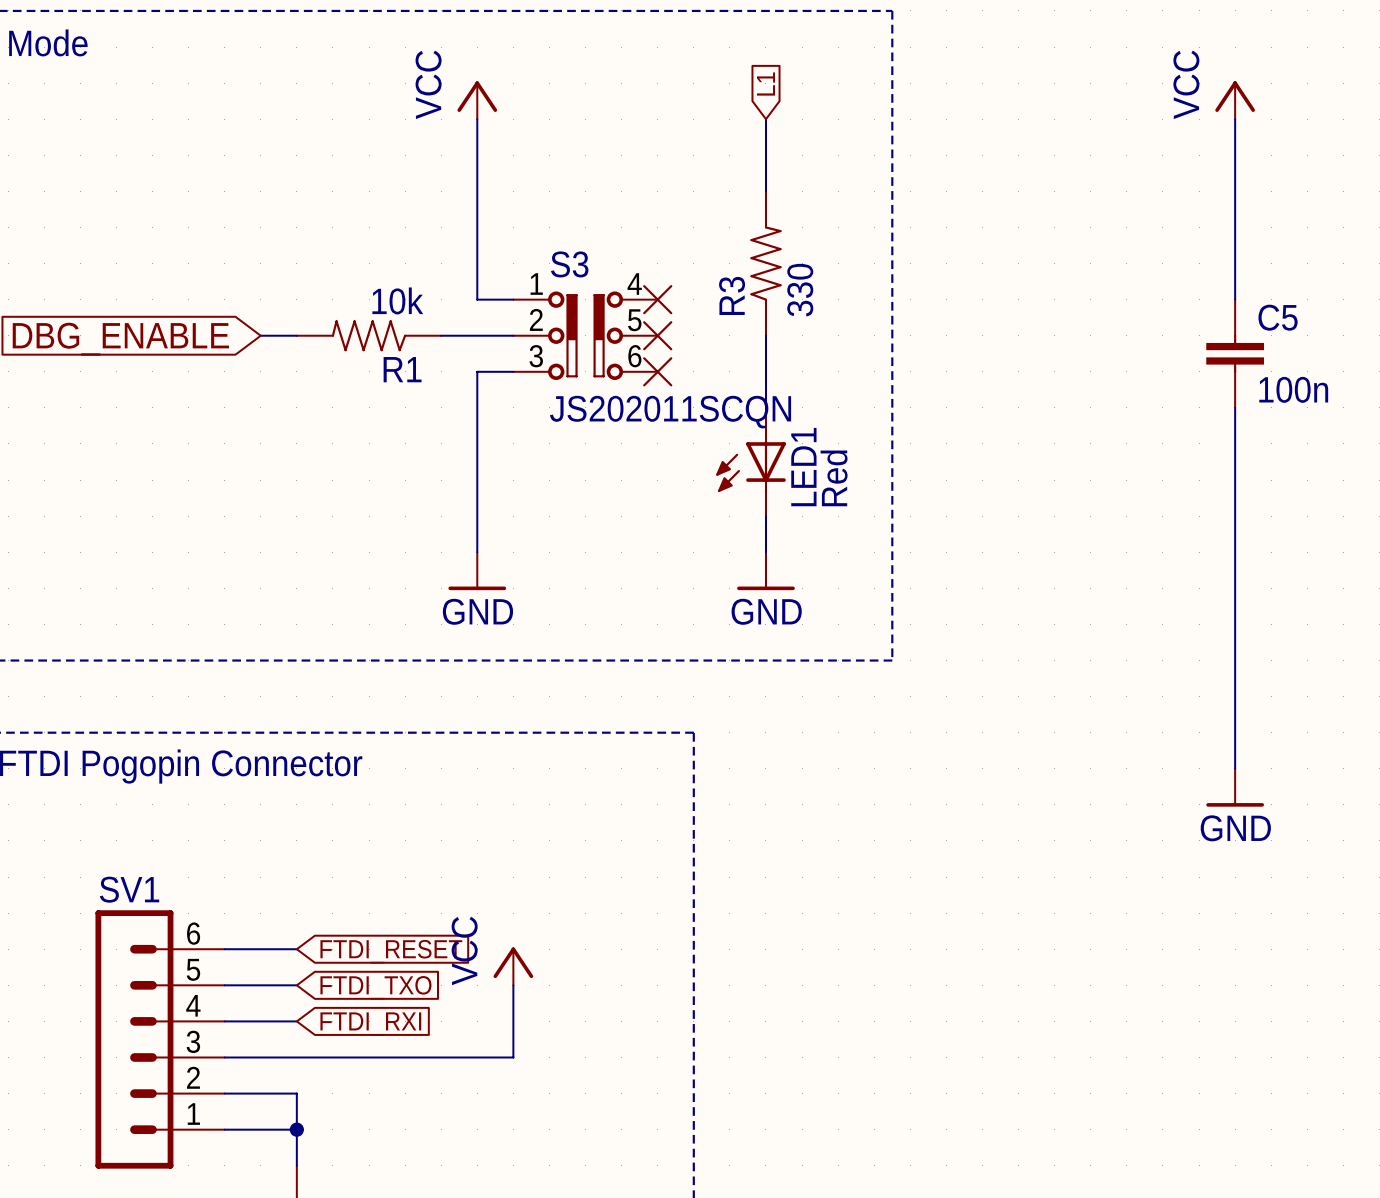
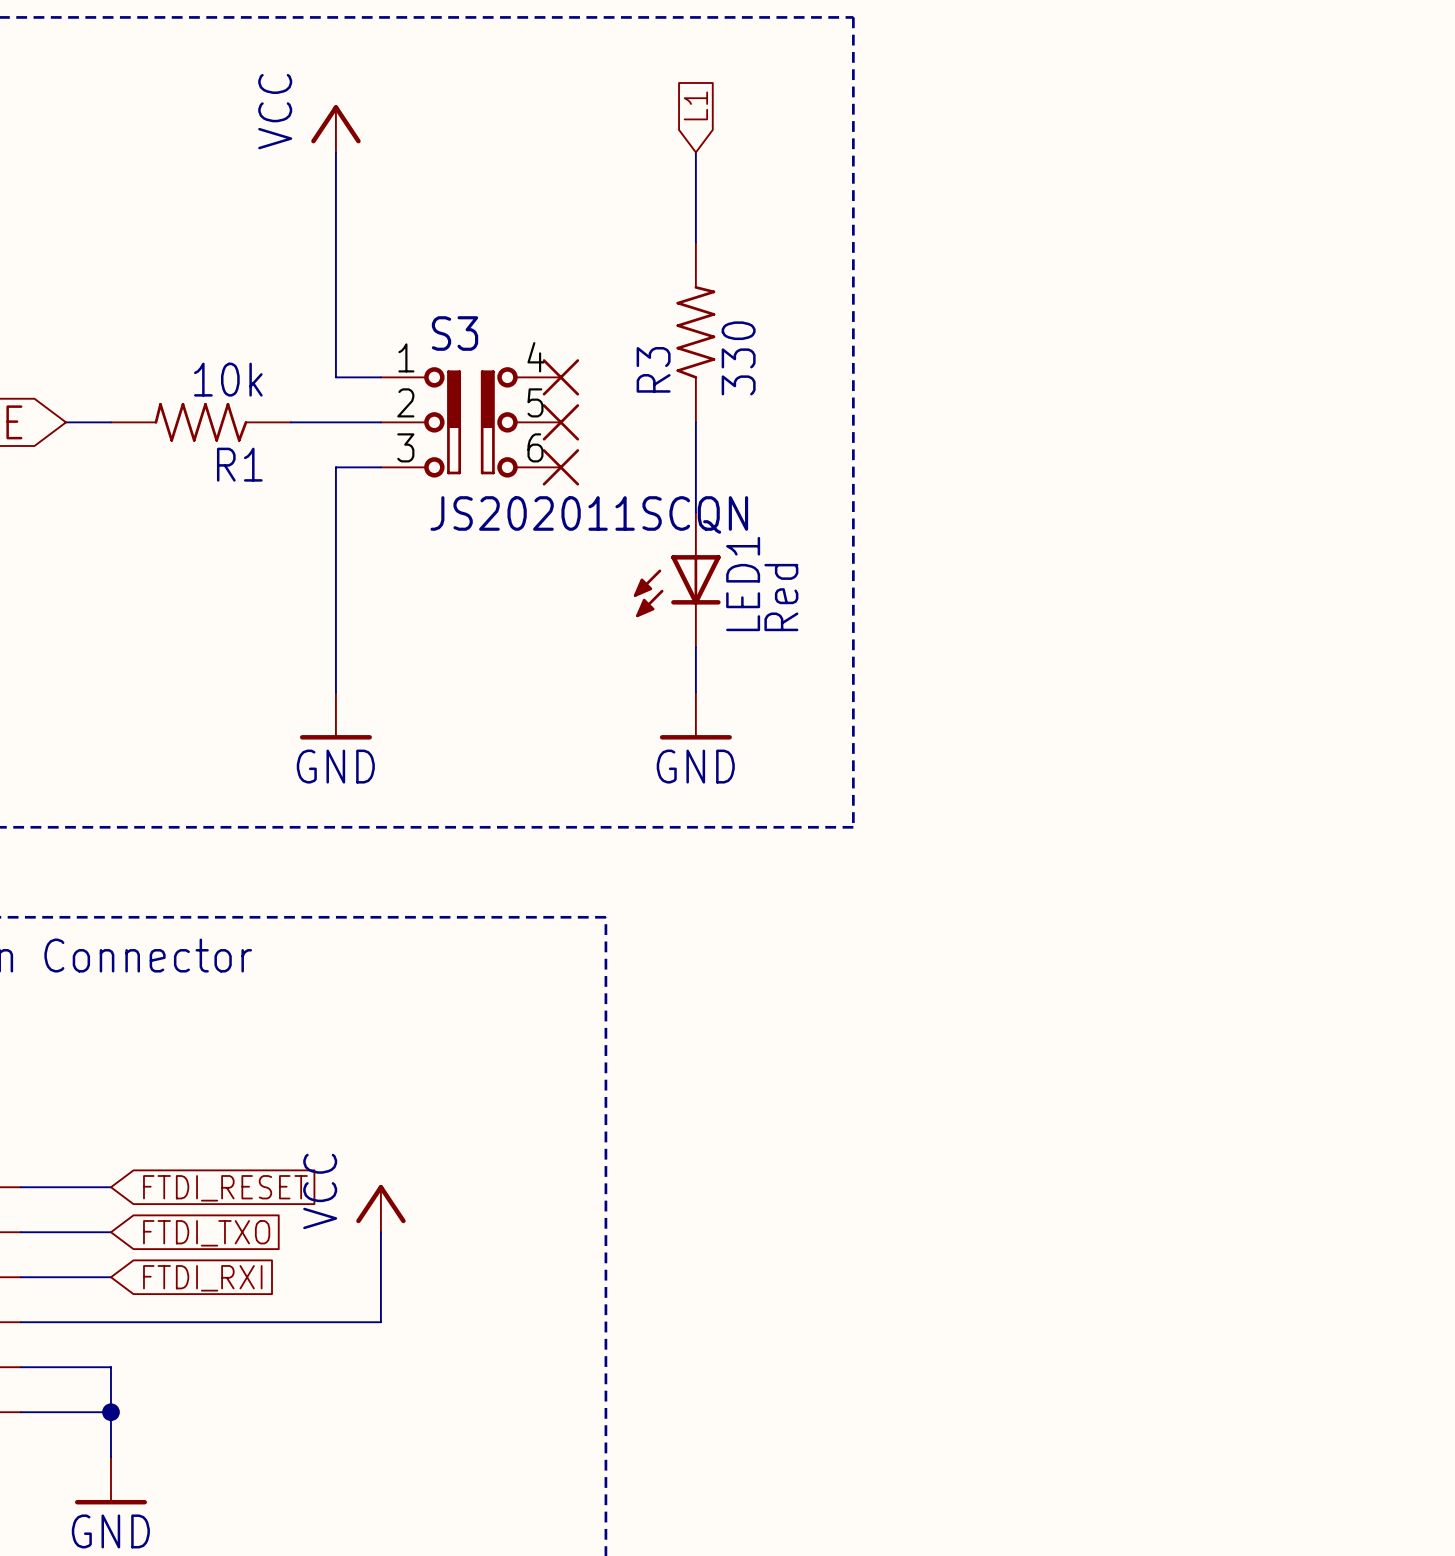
power symbol: VCC (1235, 100) -> none
wire: (1235, 119) (1235, 299) -> none
C5: 100n (1235, 353) -> none
wire: (1235, 407) (1235, 768) -> none
power symbol: GND (1235, 787) -> none

